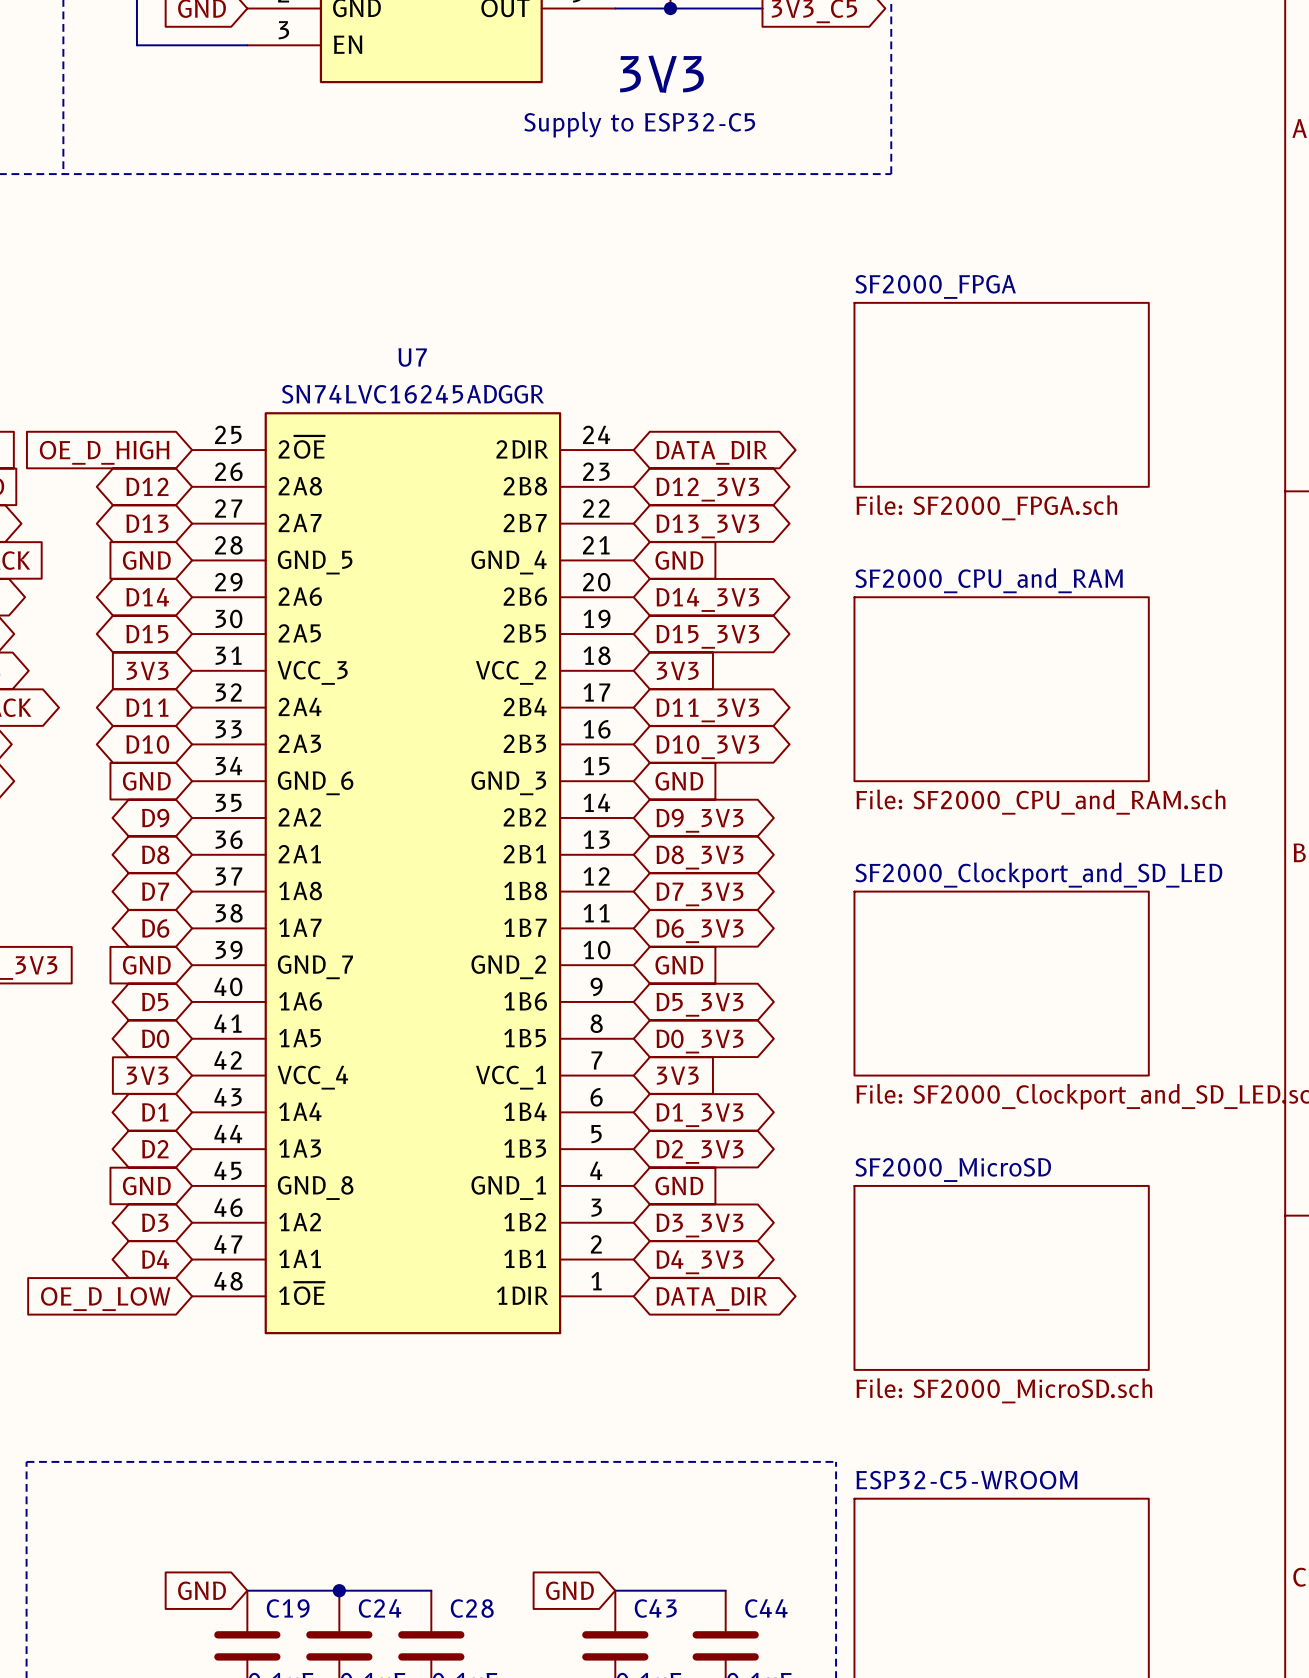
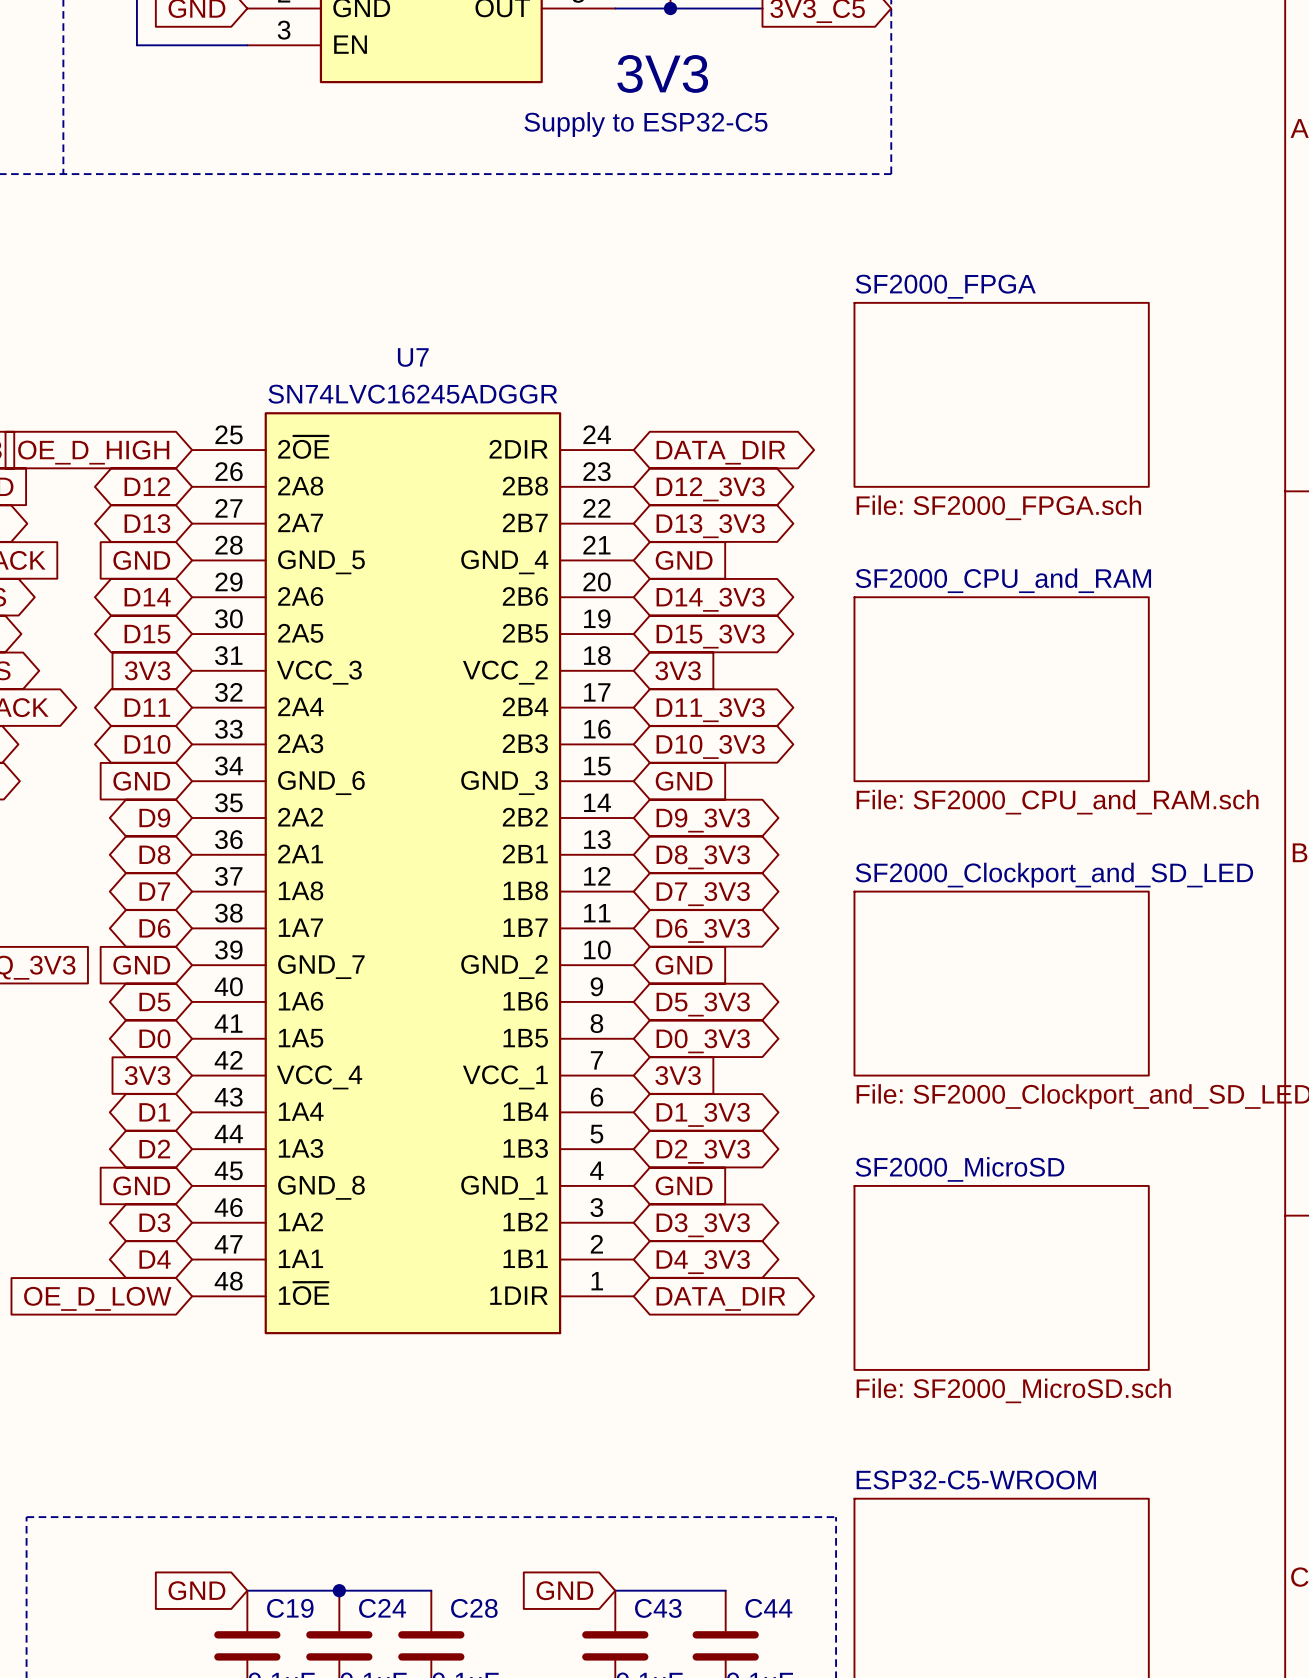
line: (26, 1517) (26, 1461) (836, 1461) (836, 1517) -> (26, 1517) (836, 1517)

